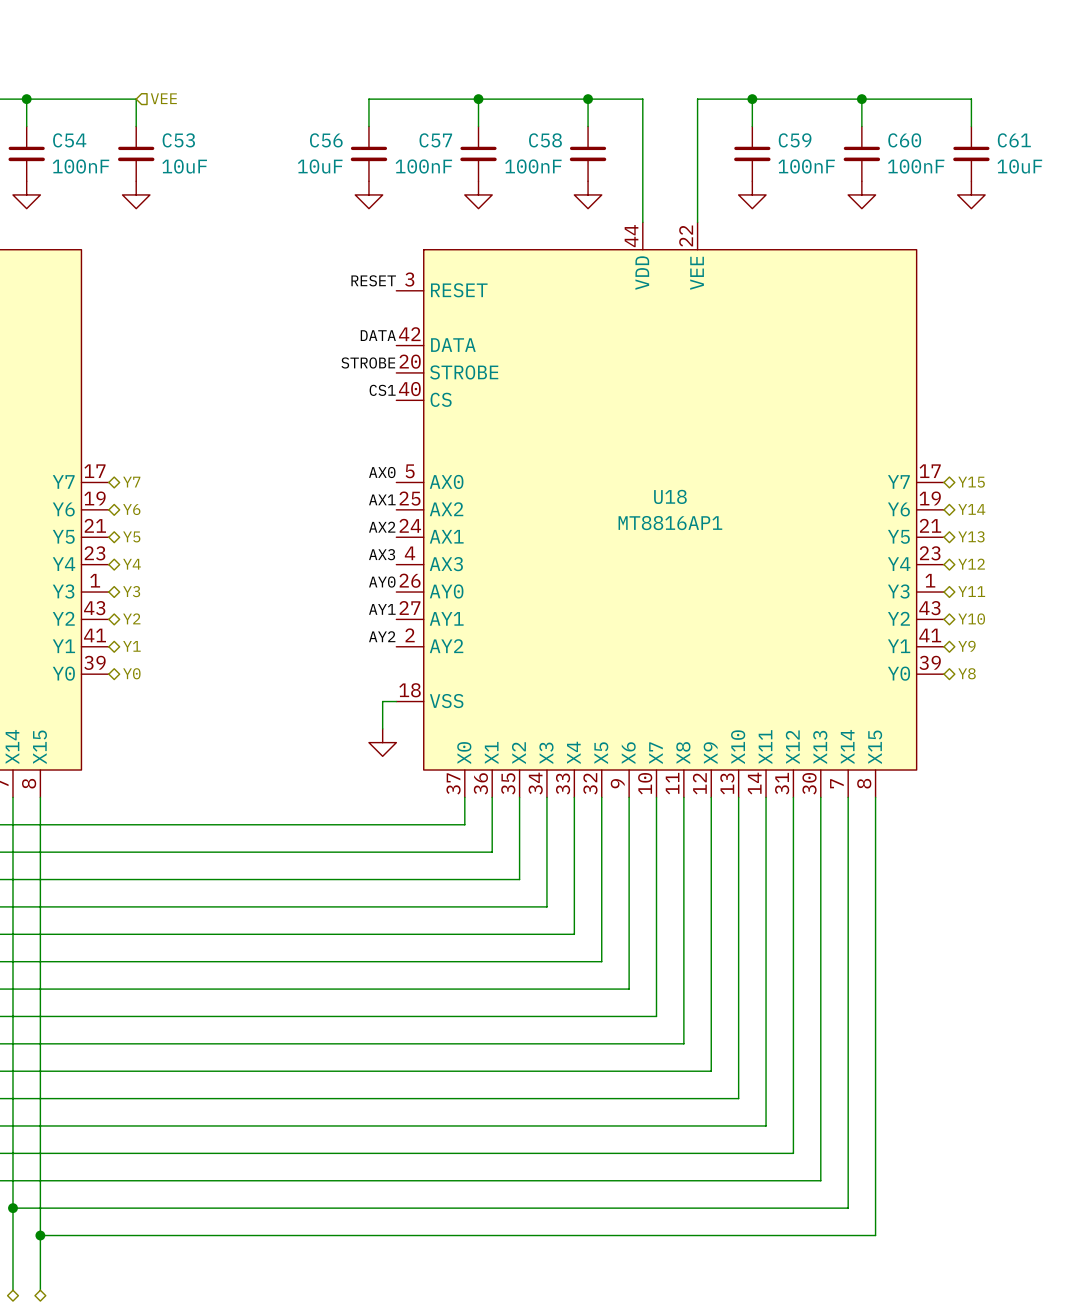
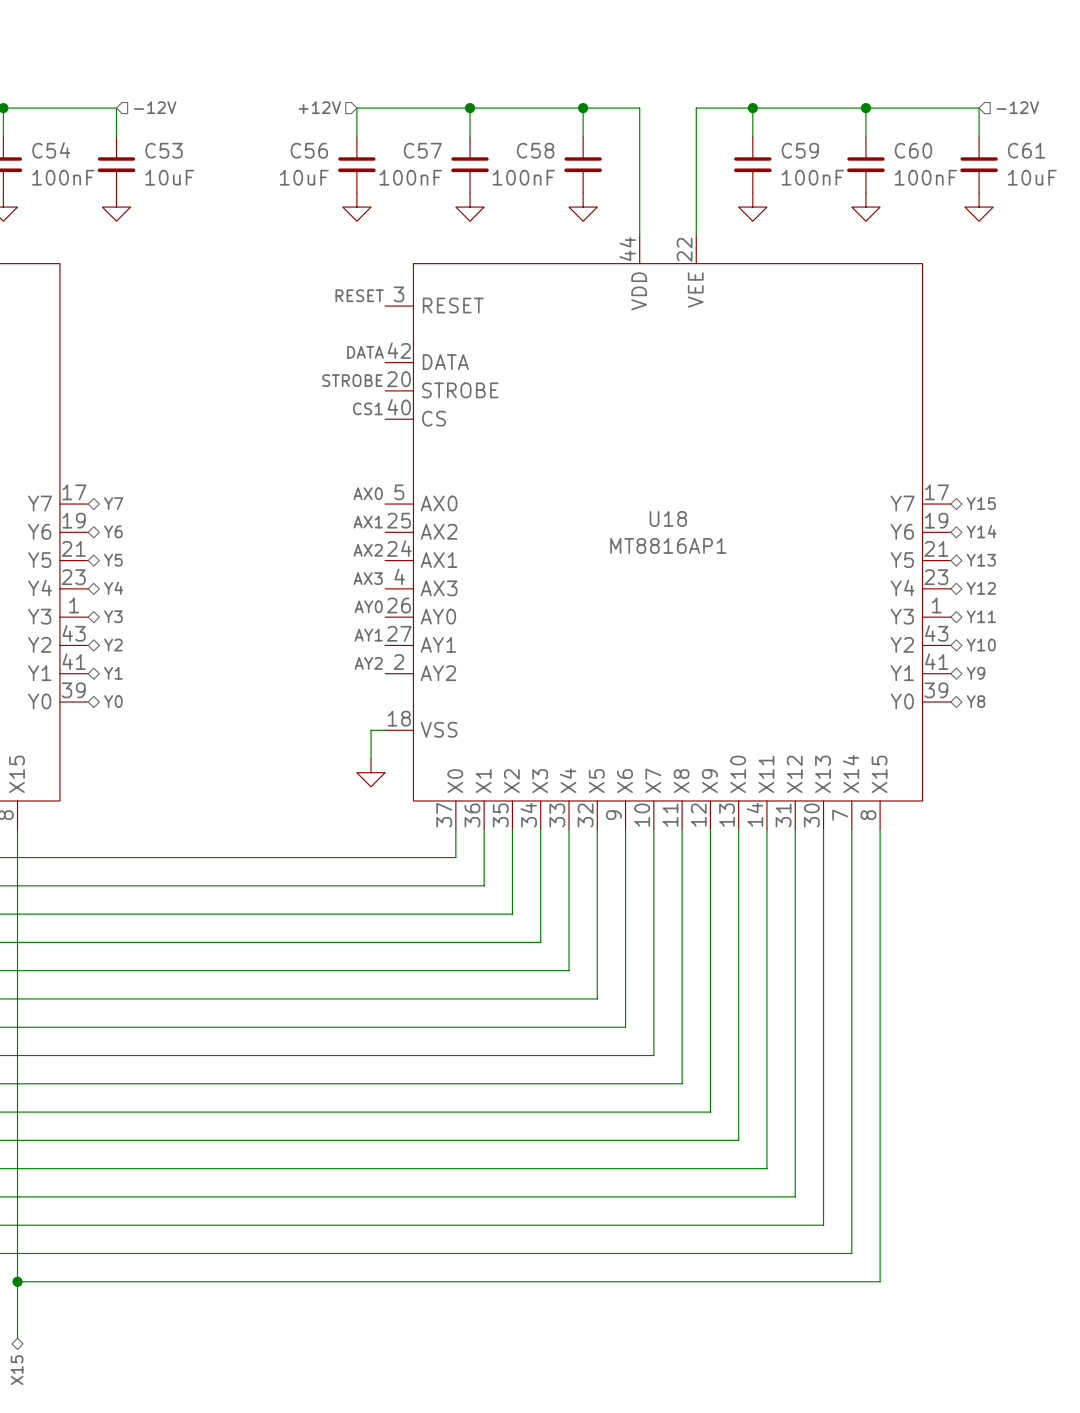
hierarchical label: VEE (163, 98) -> -12V (155, 107)
hierarchical label: none -> +12V (319, 107)
hierarchical label: none -> -12V (1017, 107)

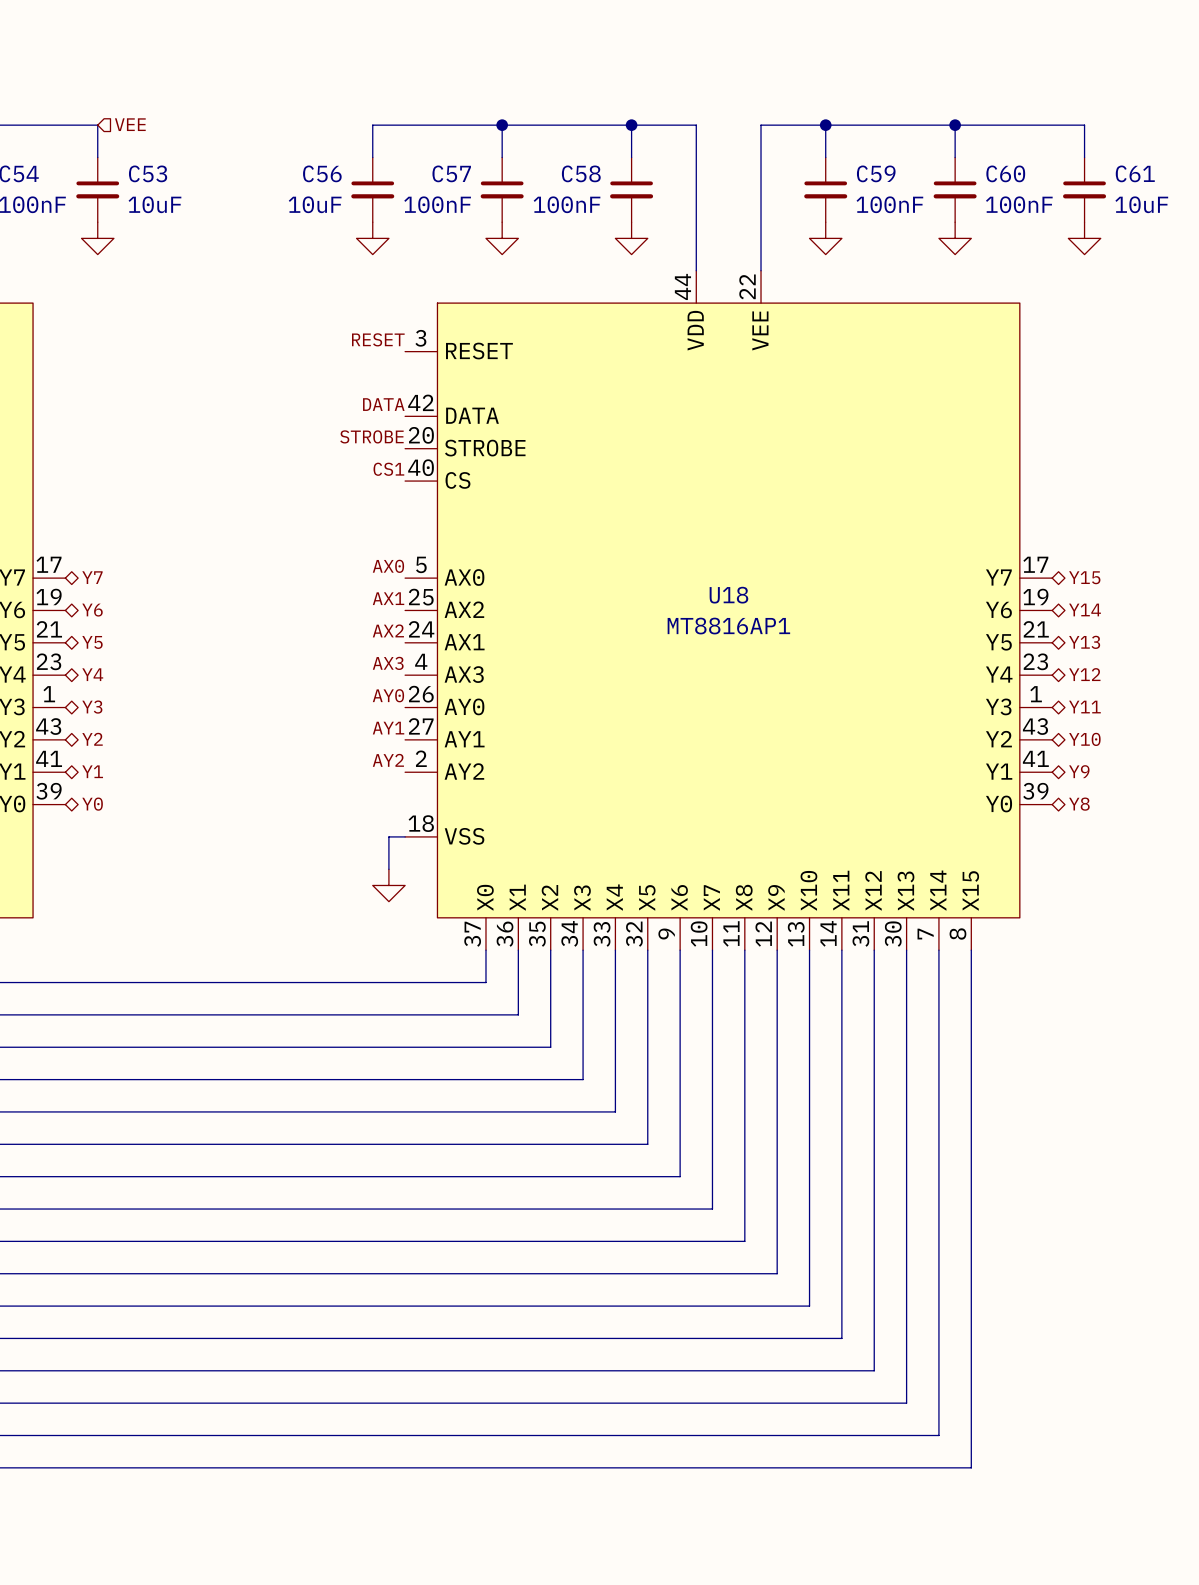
hierarchical label: -12V (155, 107) -> VEE (130, 124)
hierarchical label: +12V (319, 107) -> none
hierarchical label: -12V (1017, 107) -> none

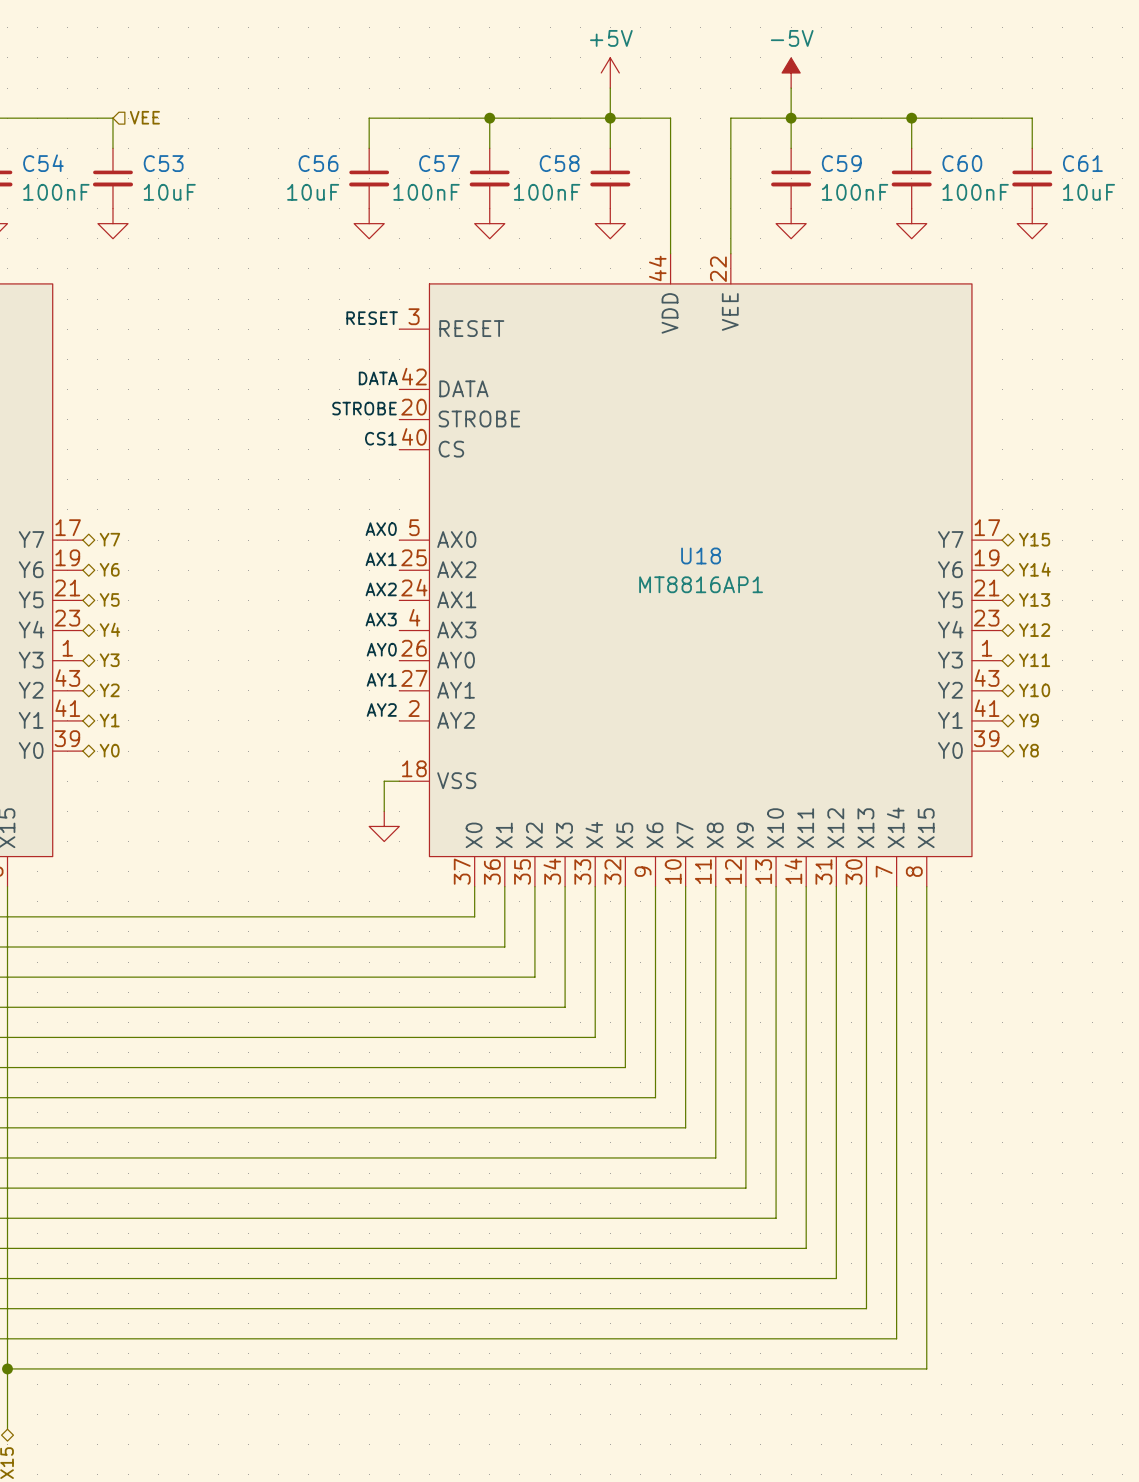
power symbol: none -> +5V (610, 72)
power symbol: none -> -5V (791, 72)
wire: none -> (610, 88) (610, 118)
wire: none -> (791, 88) (791, 118)

